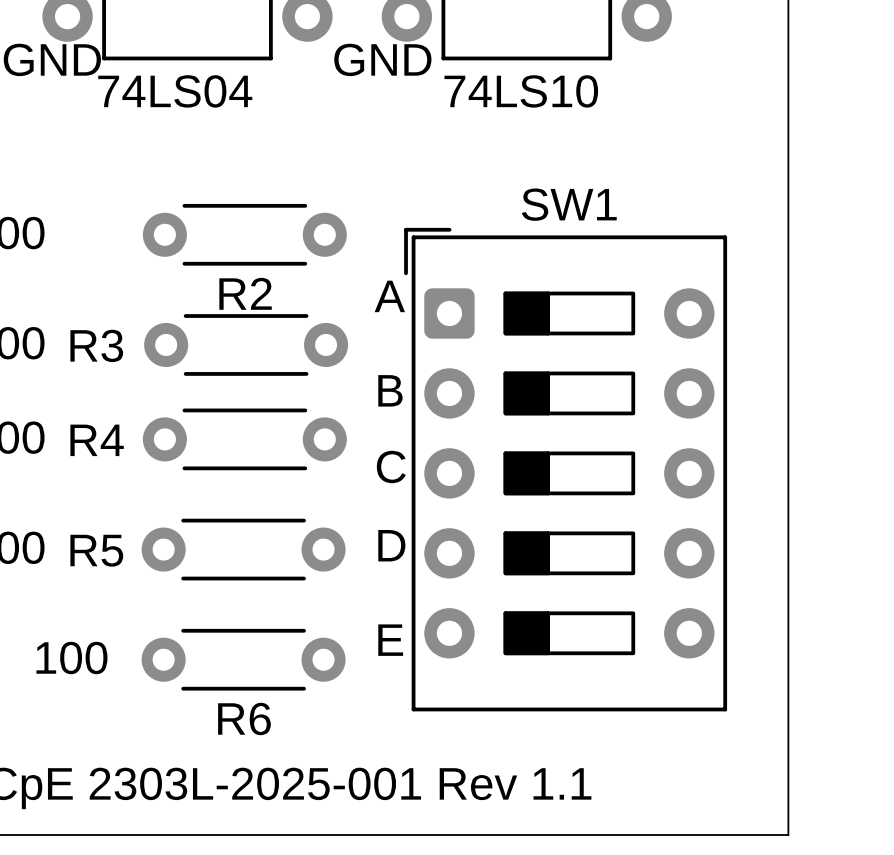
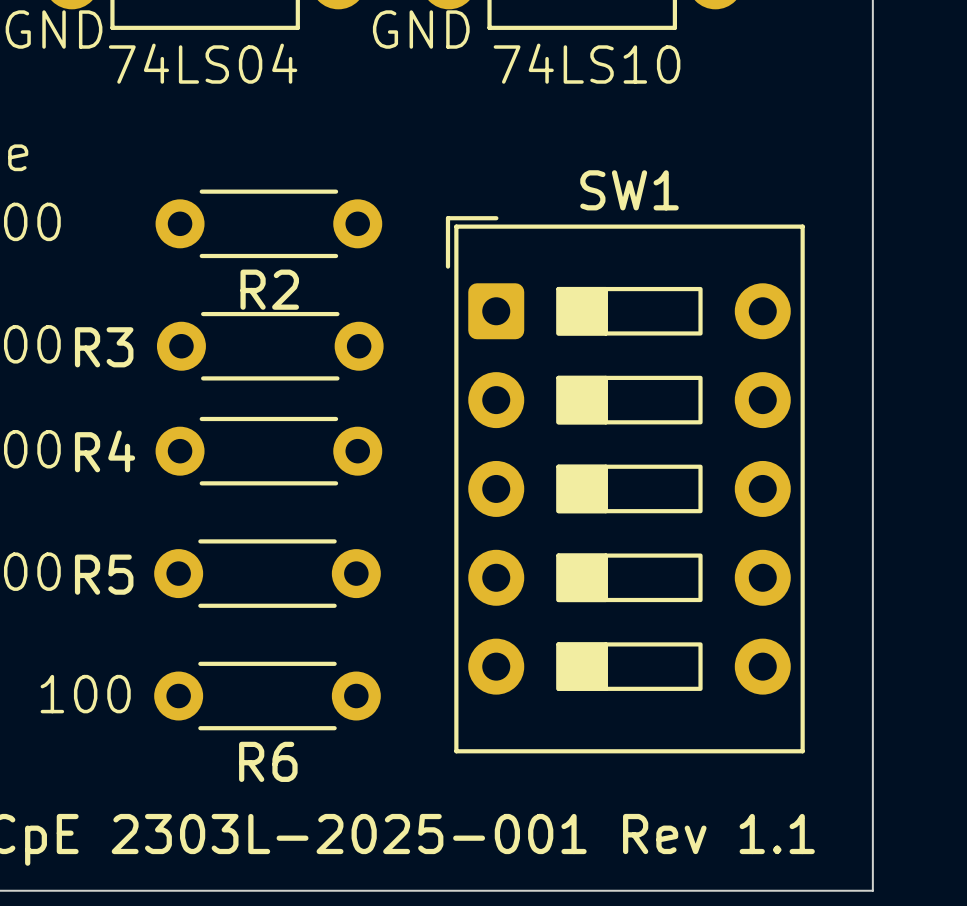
text: A (389, 296) -> none
text: B (390, 390) -> none
text: C (391, 467) -> none
text: D (391, 545) -> none
text: E (390, 640) -> none

